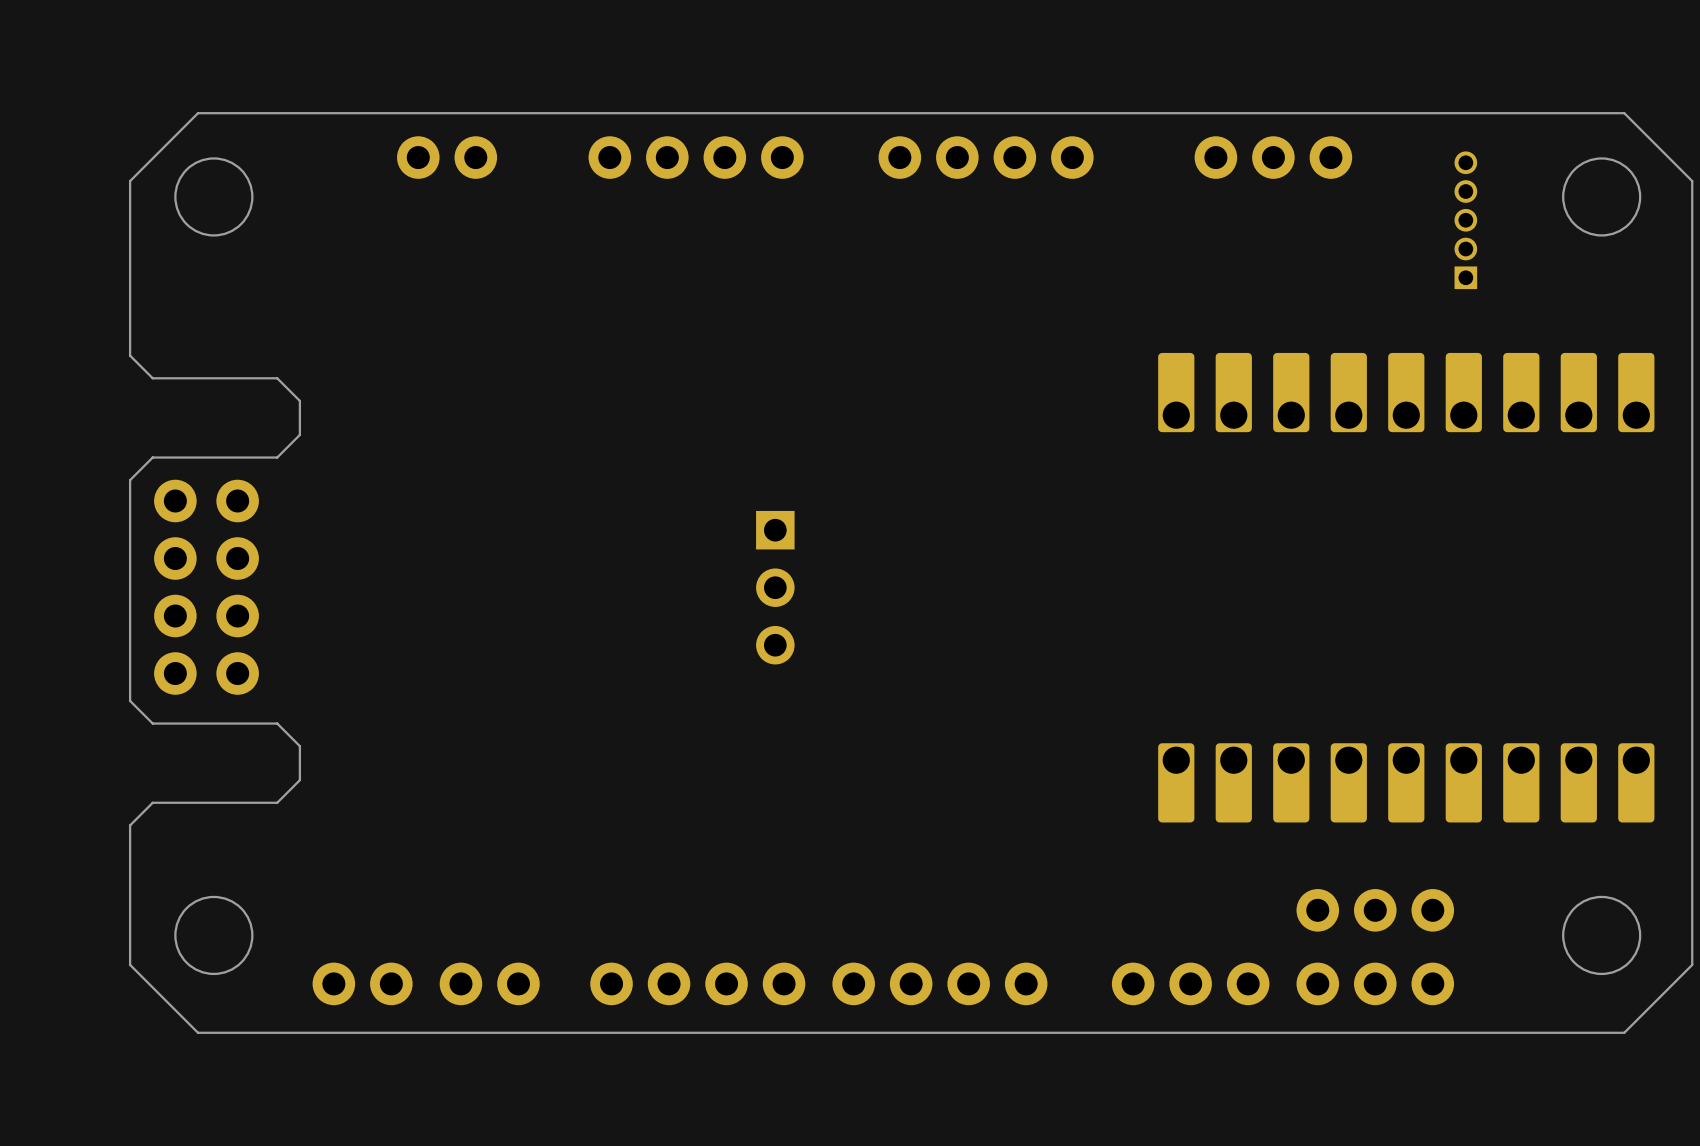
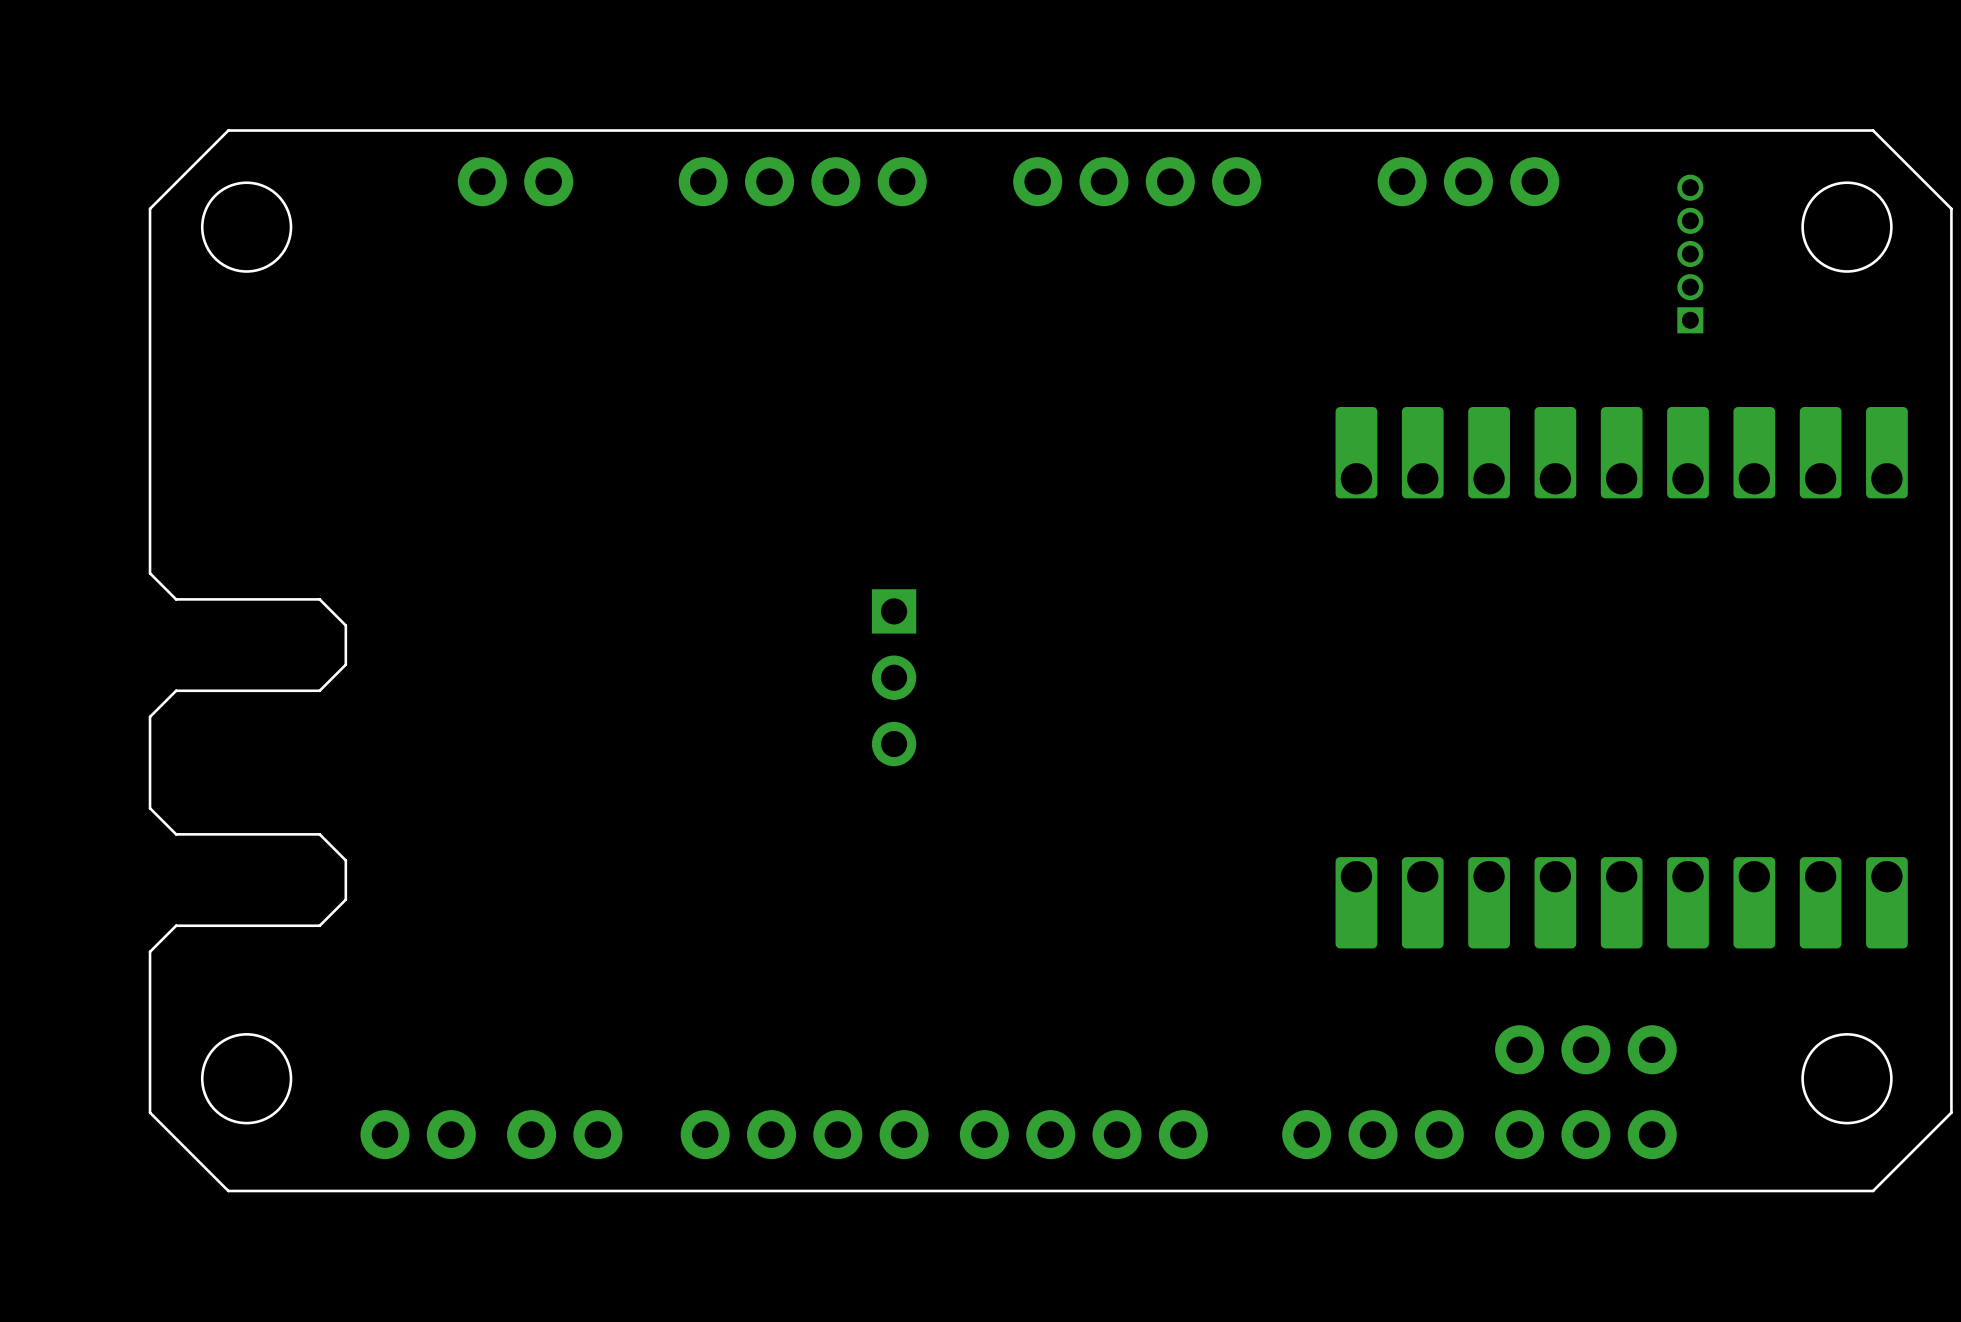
board edge: (130, 355) (152, 378) (277, 378) (299, 400) (299, 434) (277, 457) (152, 457) (130, 480) -> (150, 410) (150, 553)
board edge: (130, 497) (130, 621) -> (150, 573) (176, 599) (319, 599) (345, 625) (345, 664) (319, 690) (176, 690) (150, 716)
part: (175, 587) -> none
part: (237, 587) -> none

